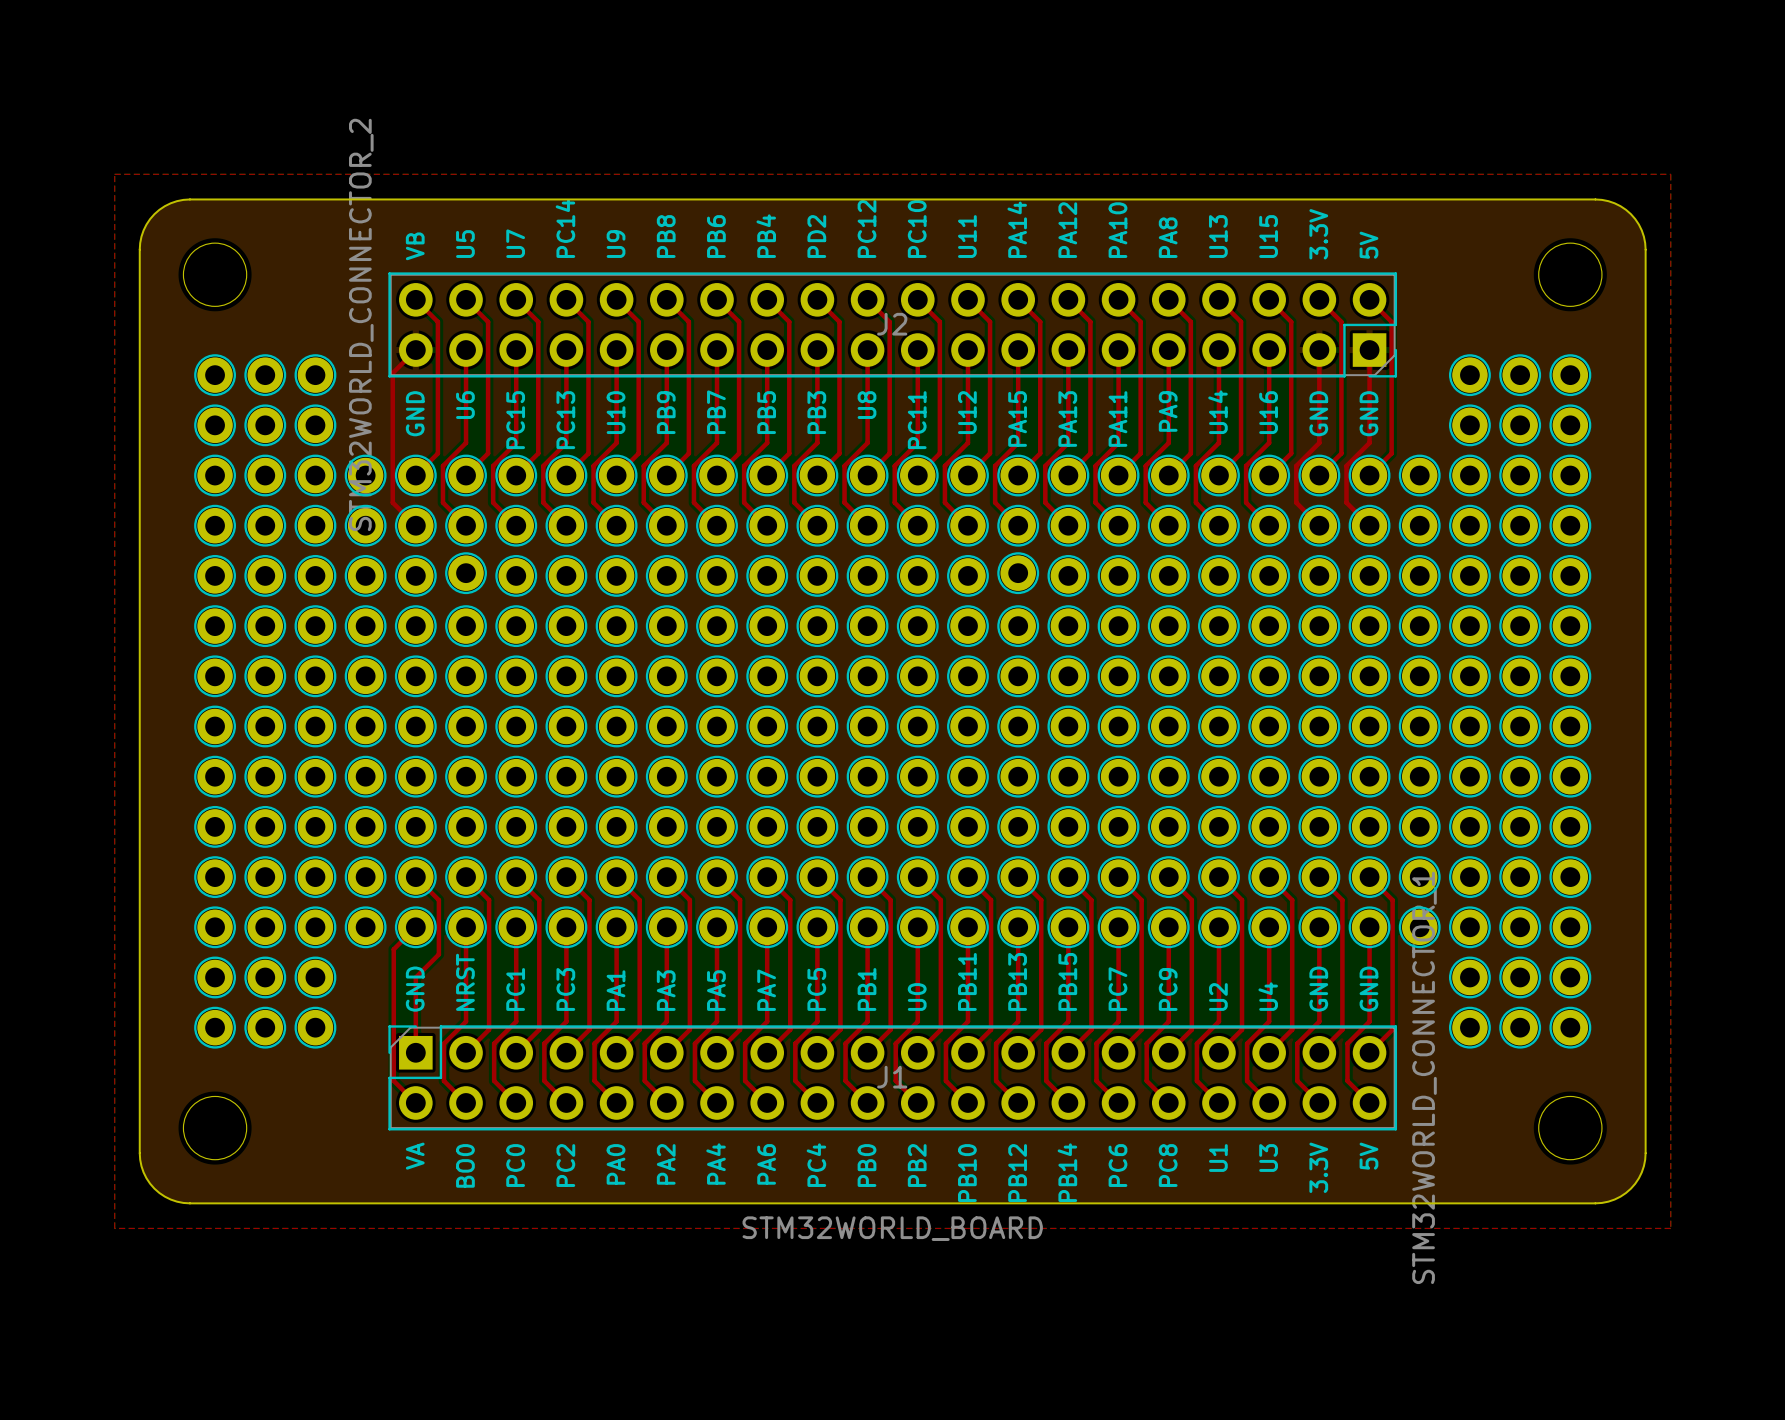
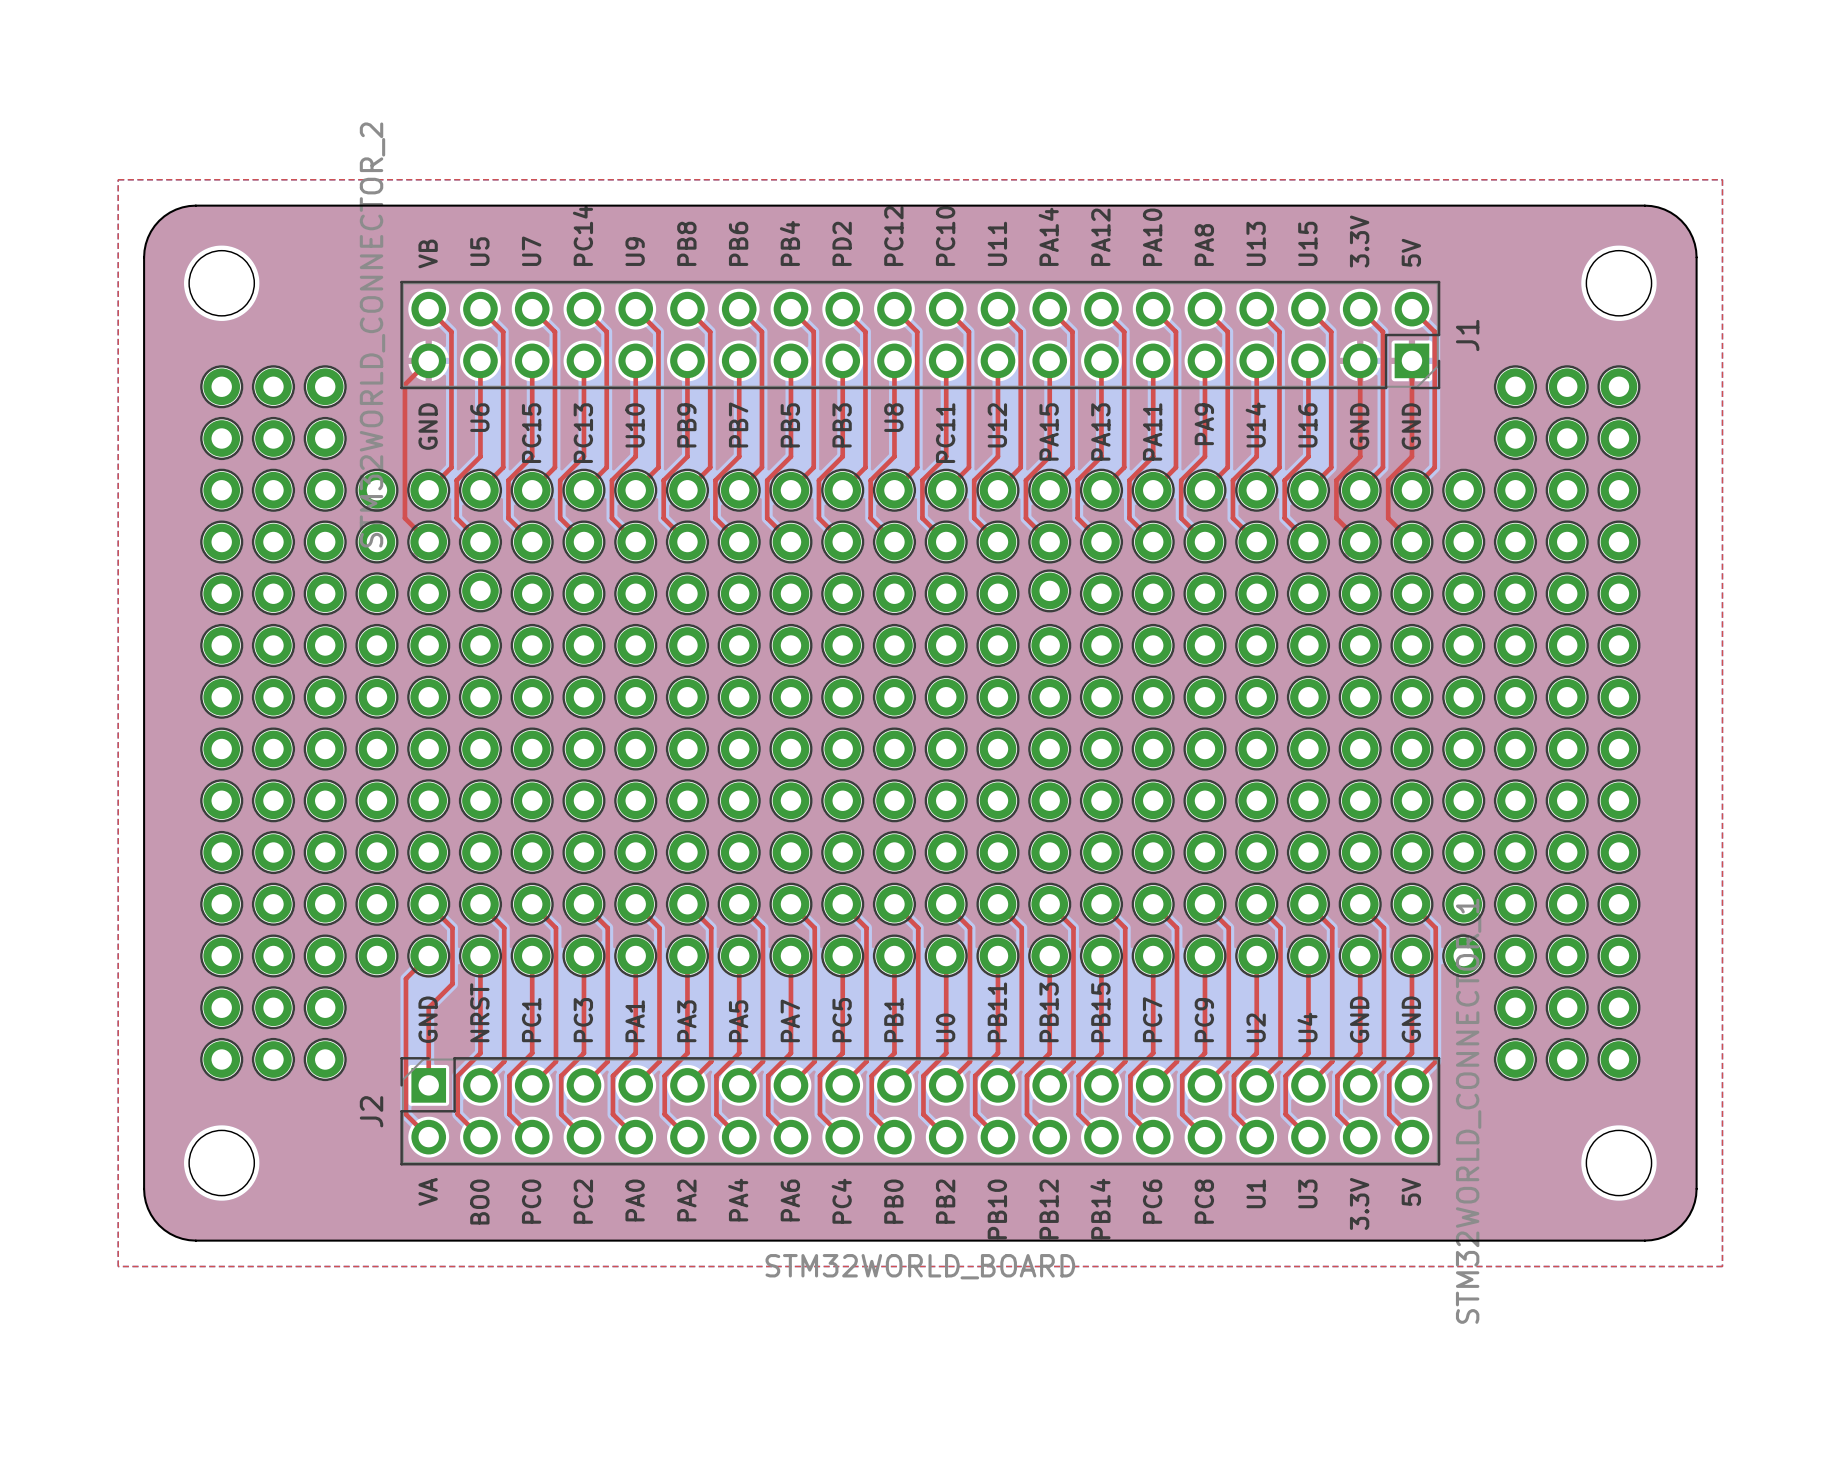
J2 name: J2 (892, 324) -> J1 (1467, 335)
J1 name: J1 (892, 1077) -> J2 (371, 1111)

